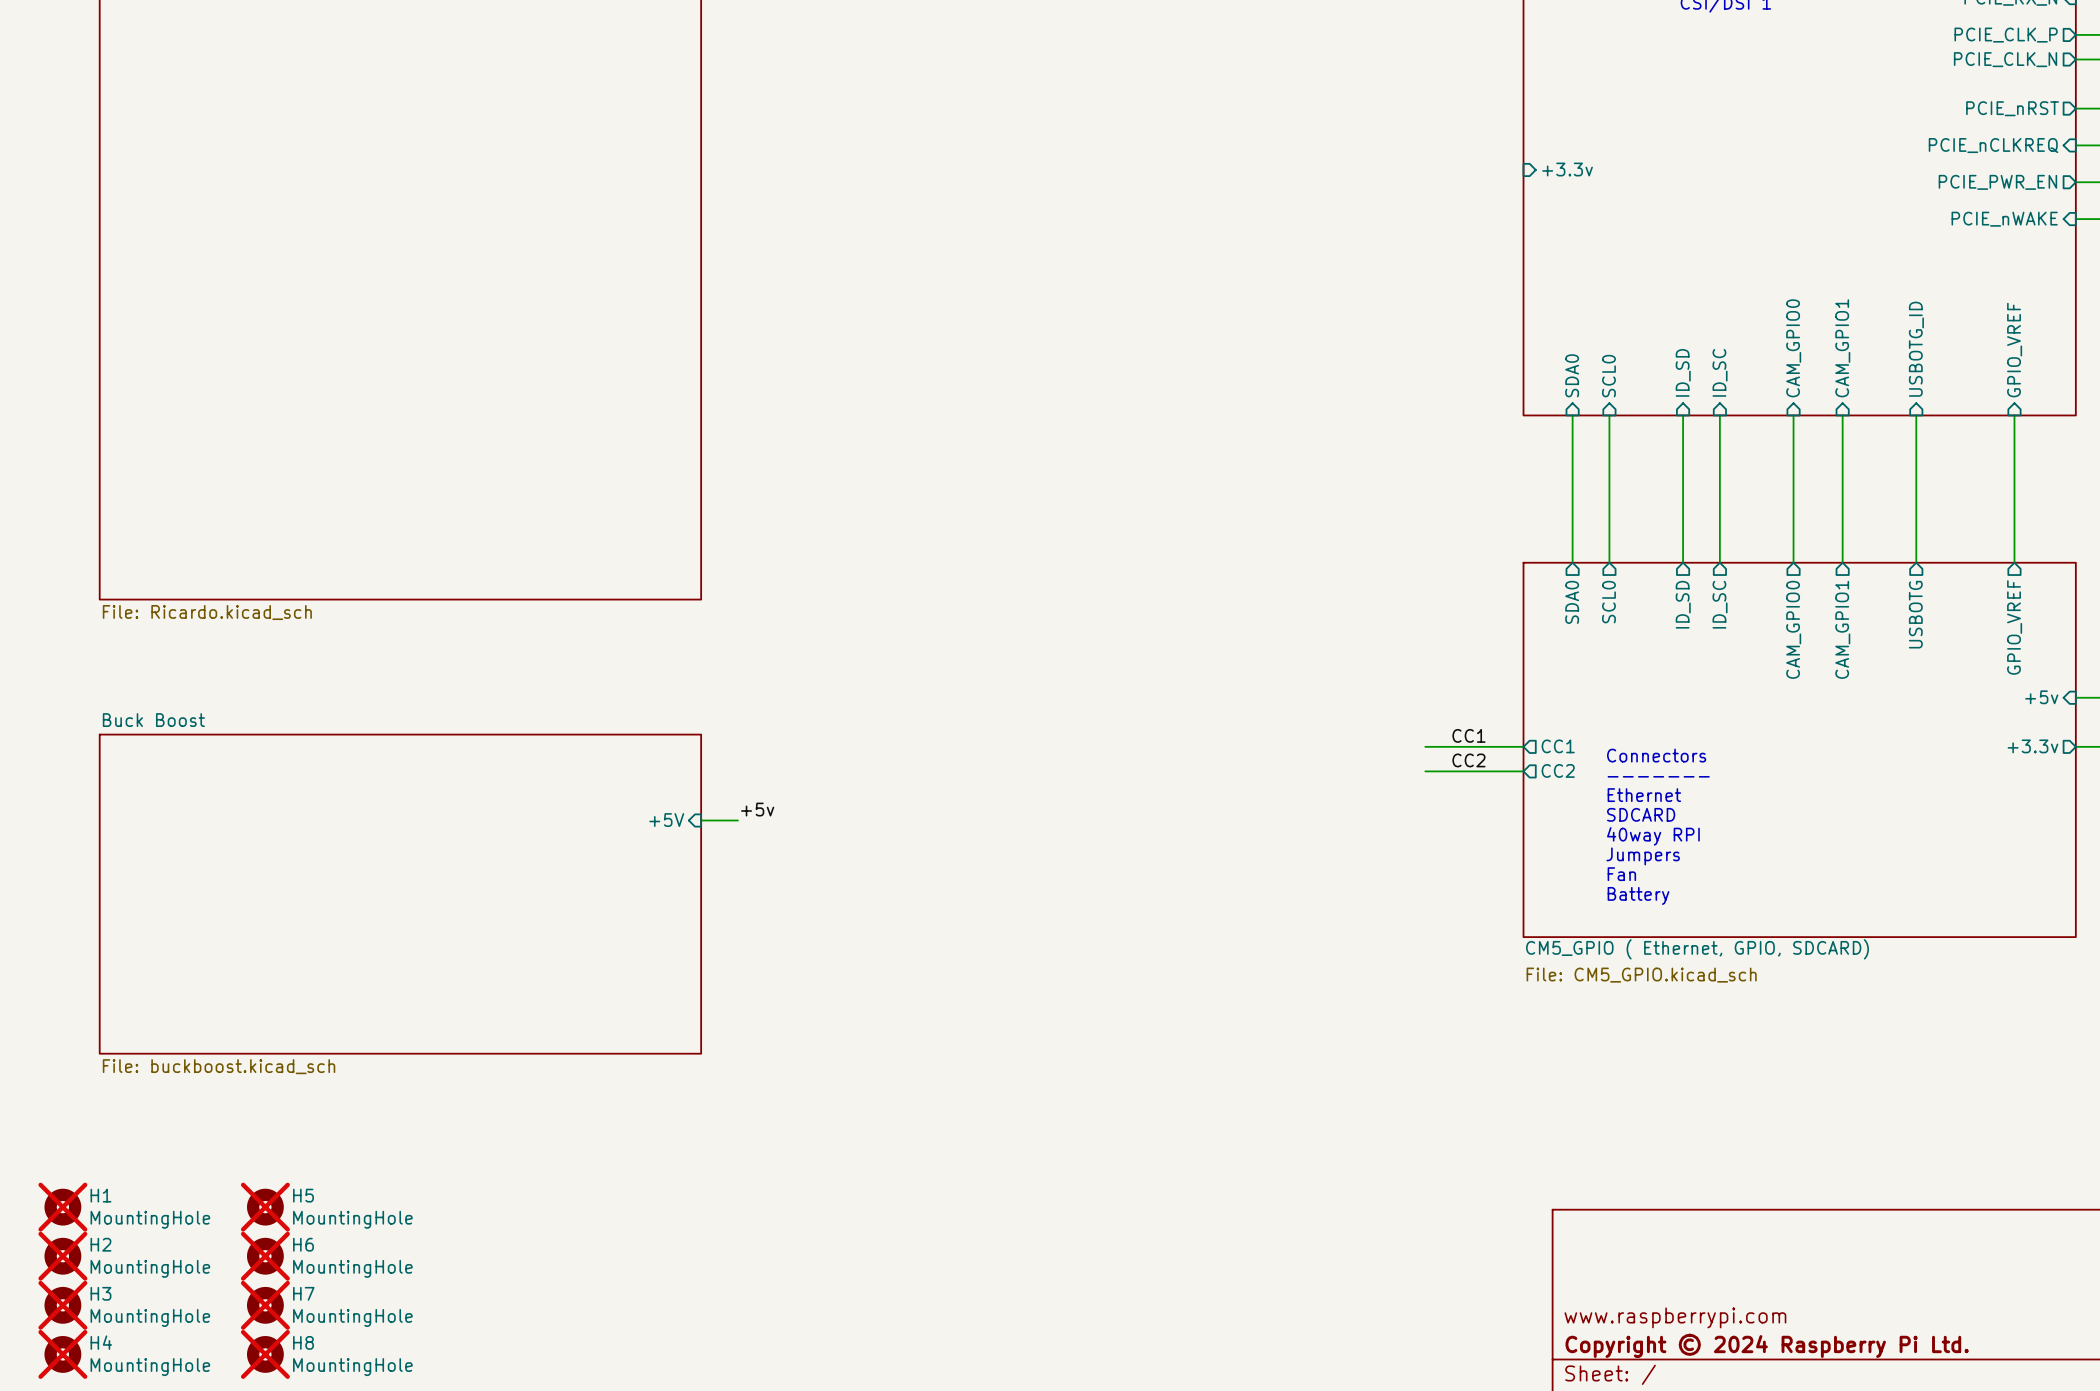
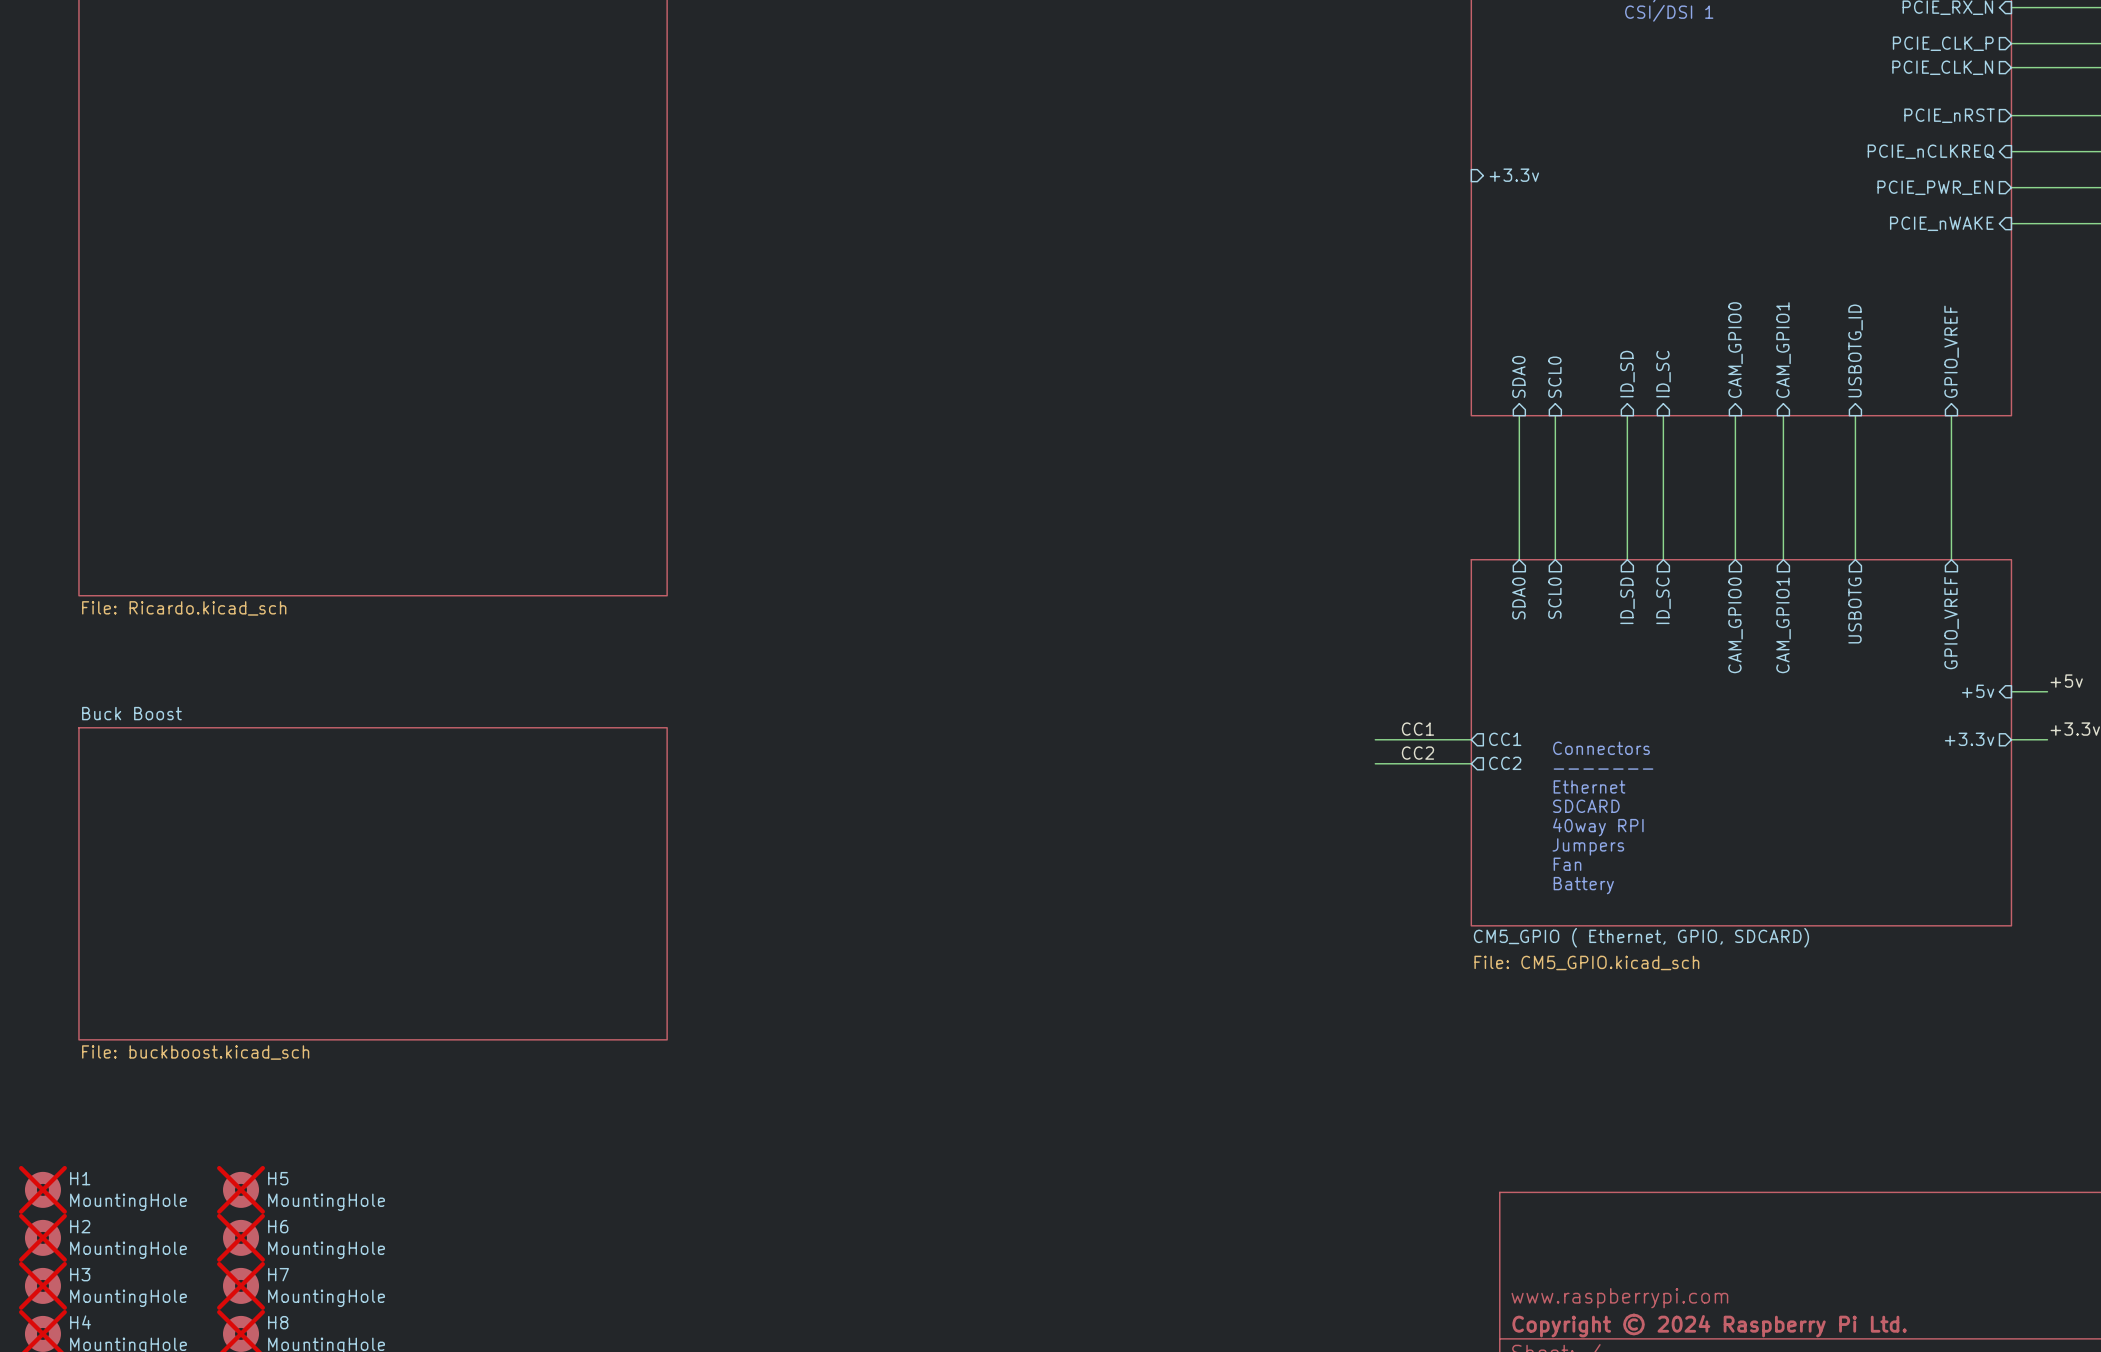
label: +5v (757, 809) -> none
sheet pin: +5V (666, 820) -> none
wire: (701, 820) (737, 820) -> none

